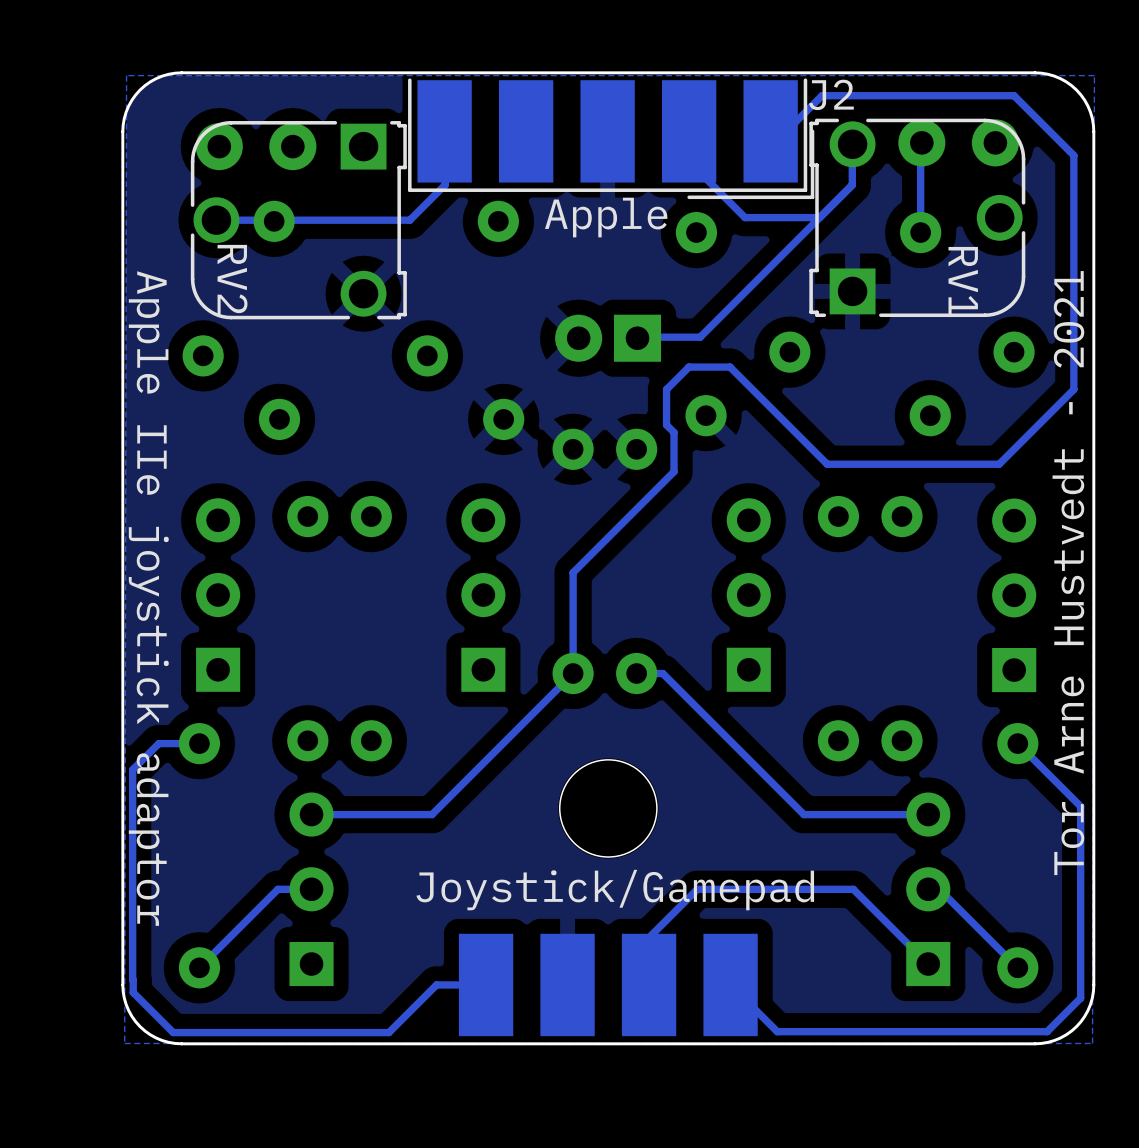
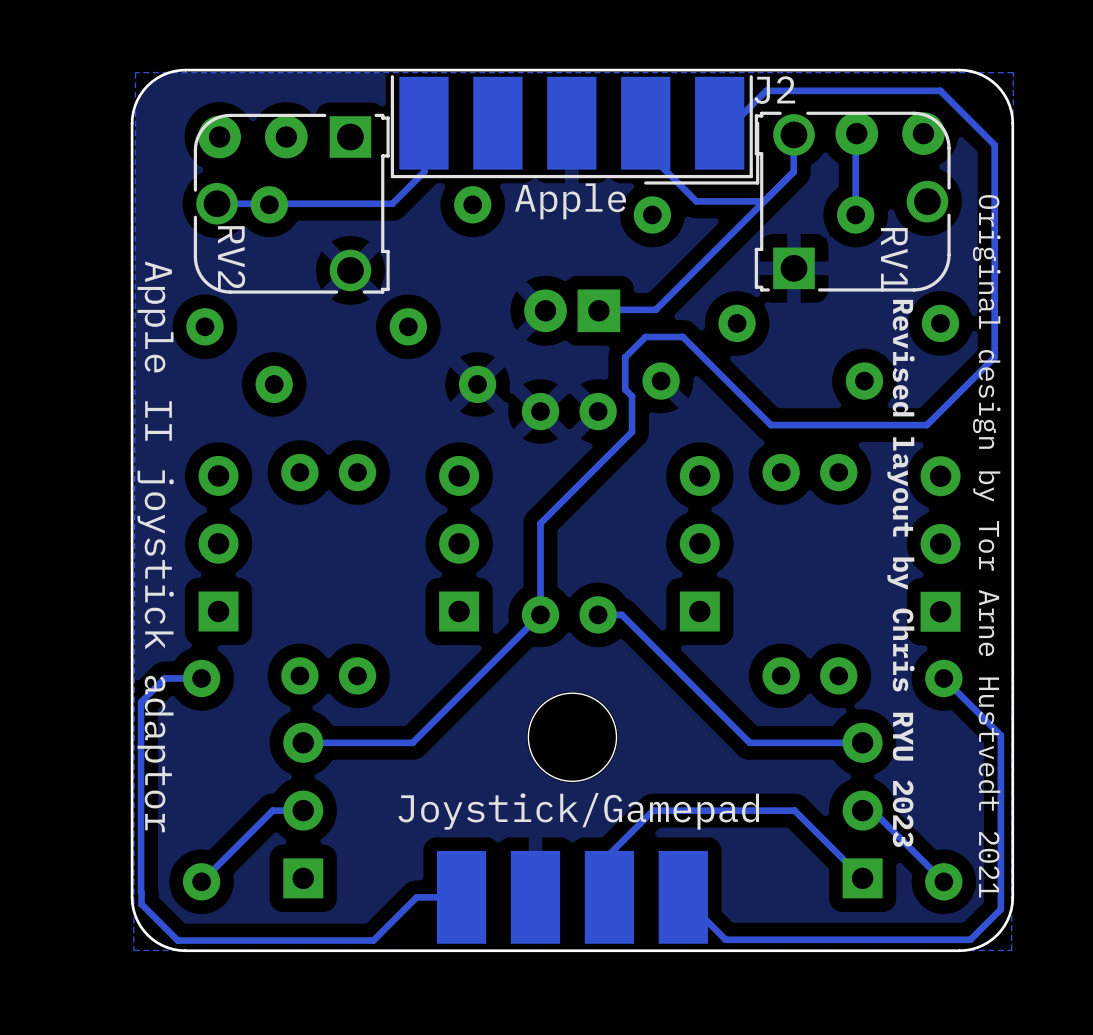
text: Tor Arne Hustvedt - 2021 (1068, 573) -> Original design by Tor Arne Hustvedt 2021 (986, 546)
text: Apple IIe joystick adaptor (148, 598) -> Apple II joystick adaptor (155, 546)
text: none -> Revised layout by Chris RYU 2023 (900, 573)

